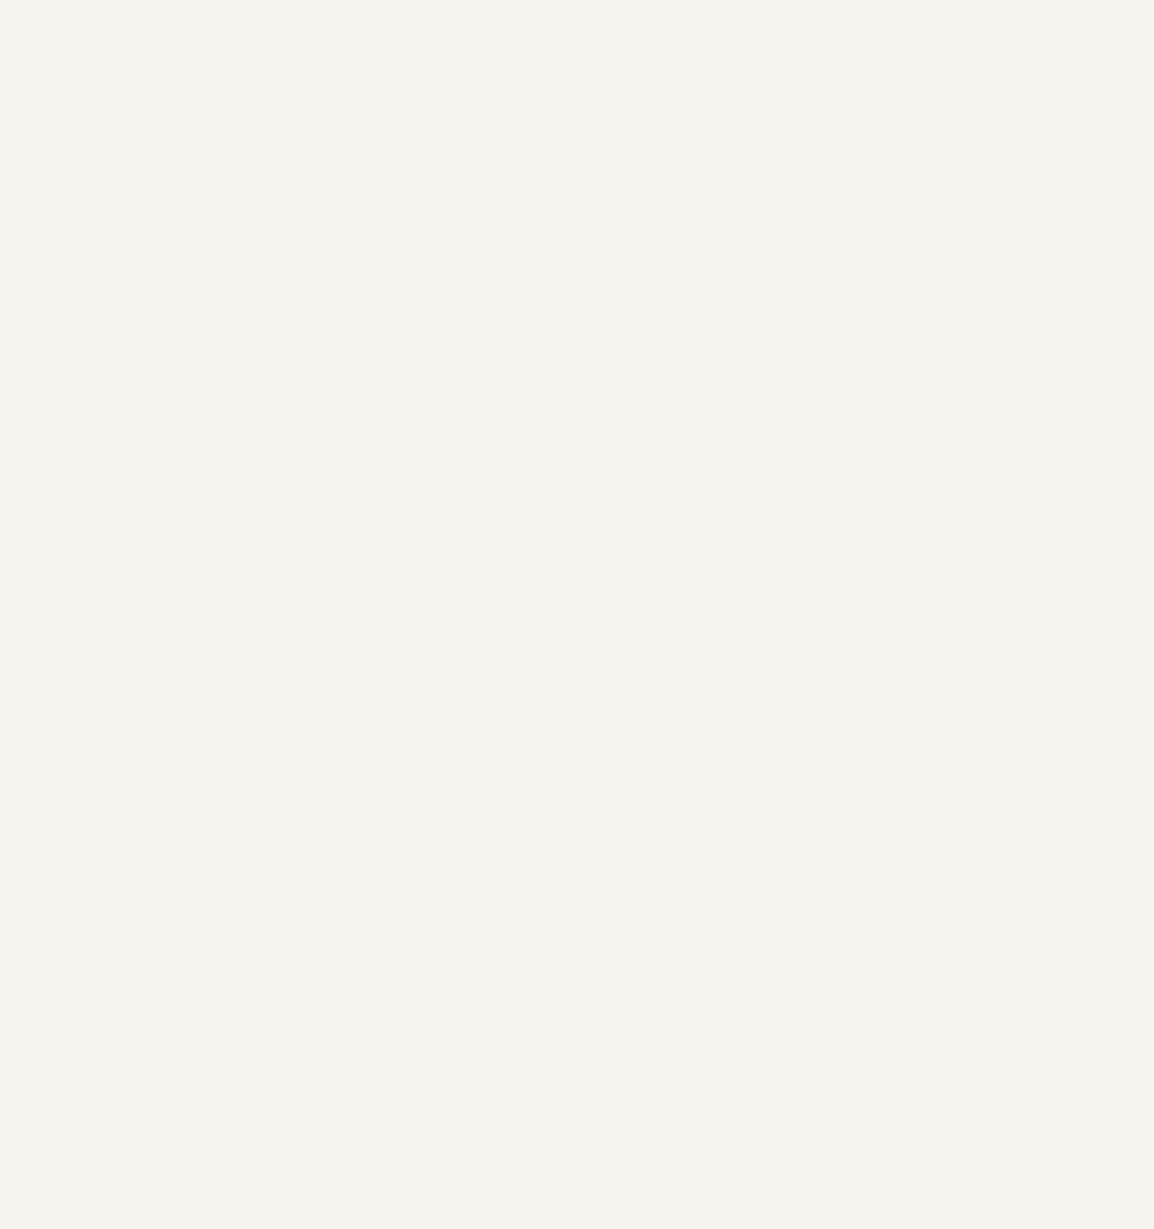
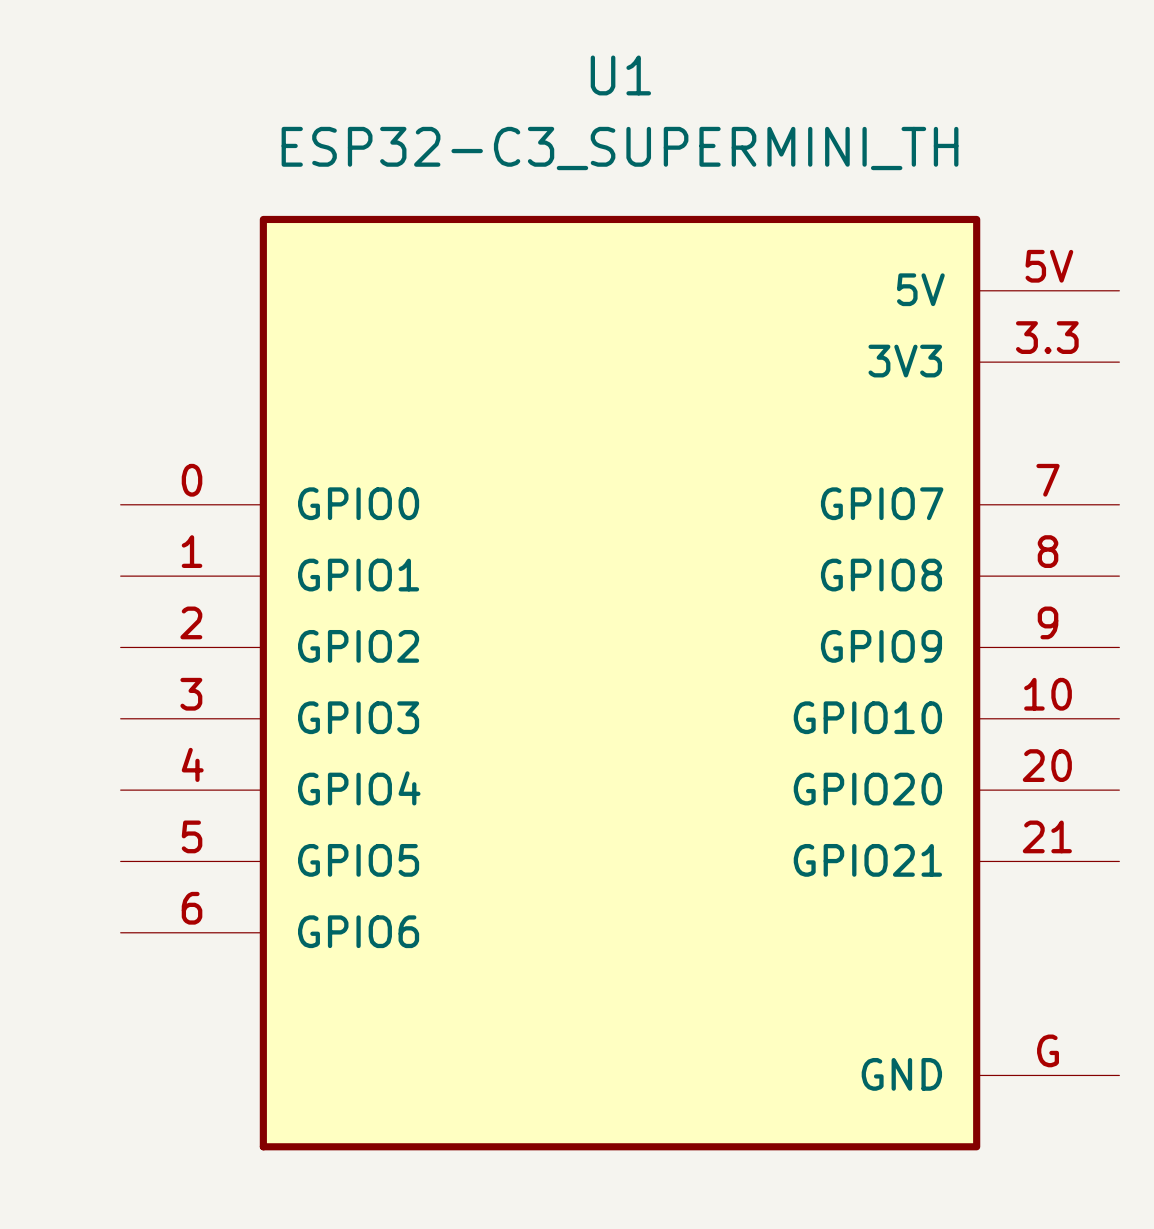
U1: none -> ESP32-C3_SUPERMINI_TH (620, 683)

